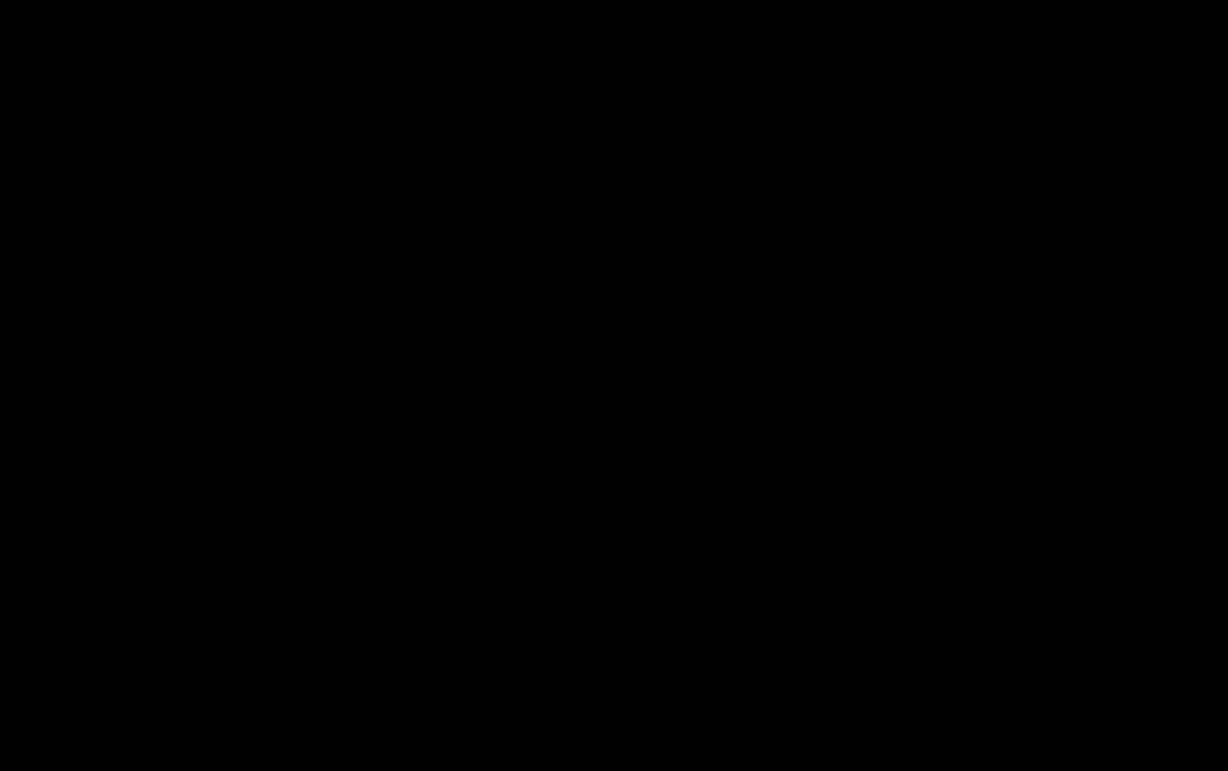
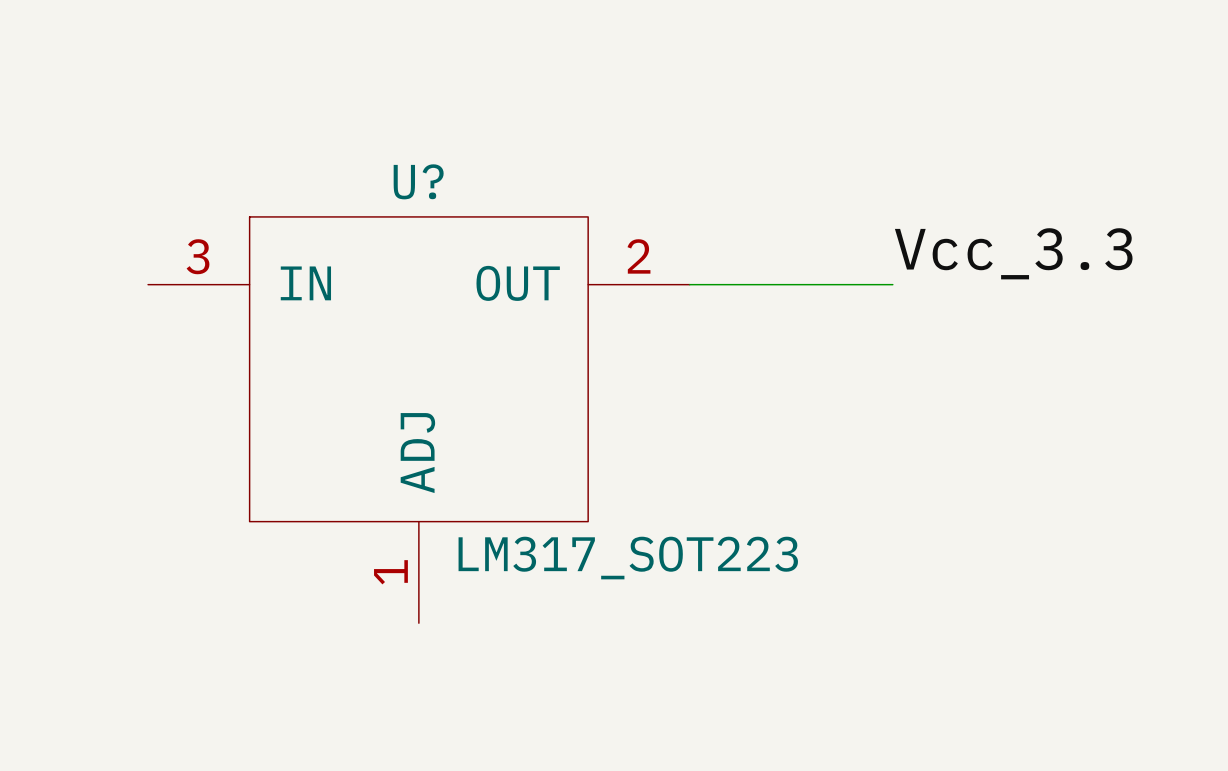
label: none -> Vcc_3.3 (1013, 253)
wire: none -> (689, 284) (892, 284)
U?: none -> LM317_SOT223 (418, 420)

